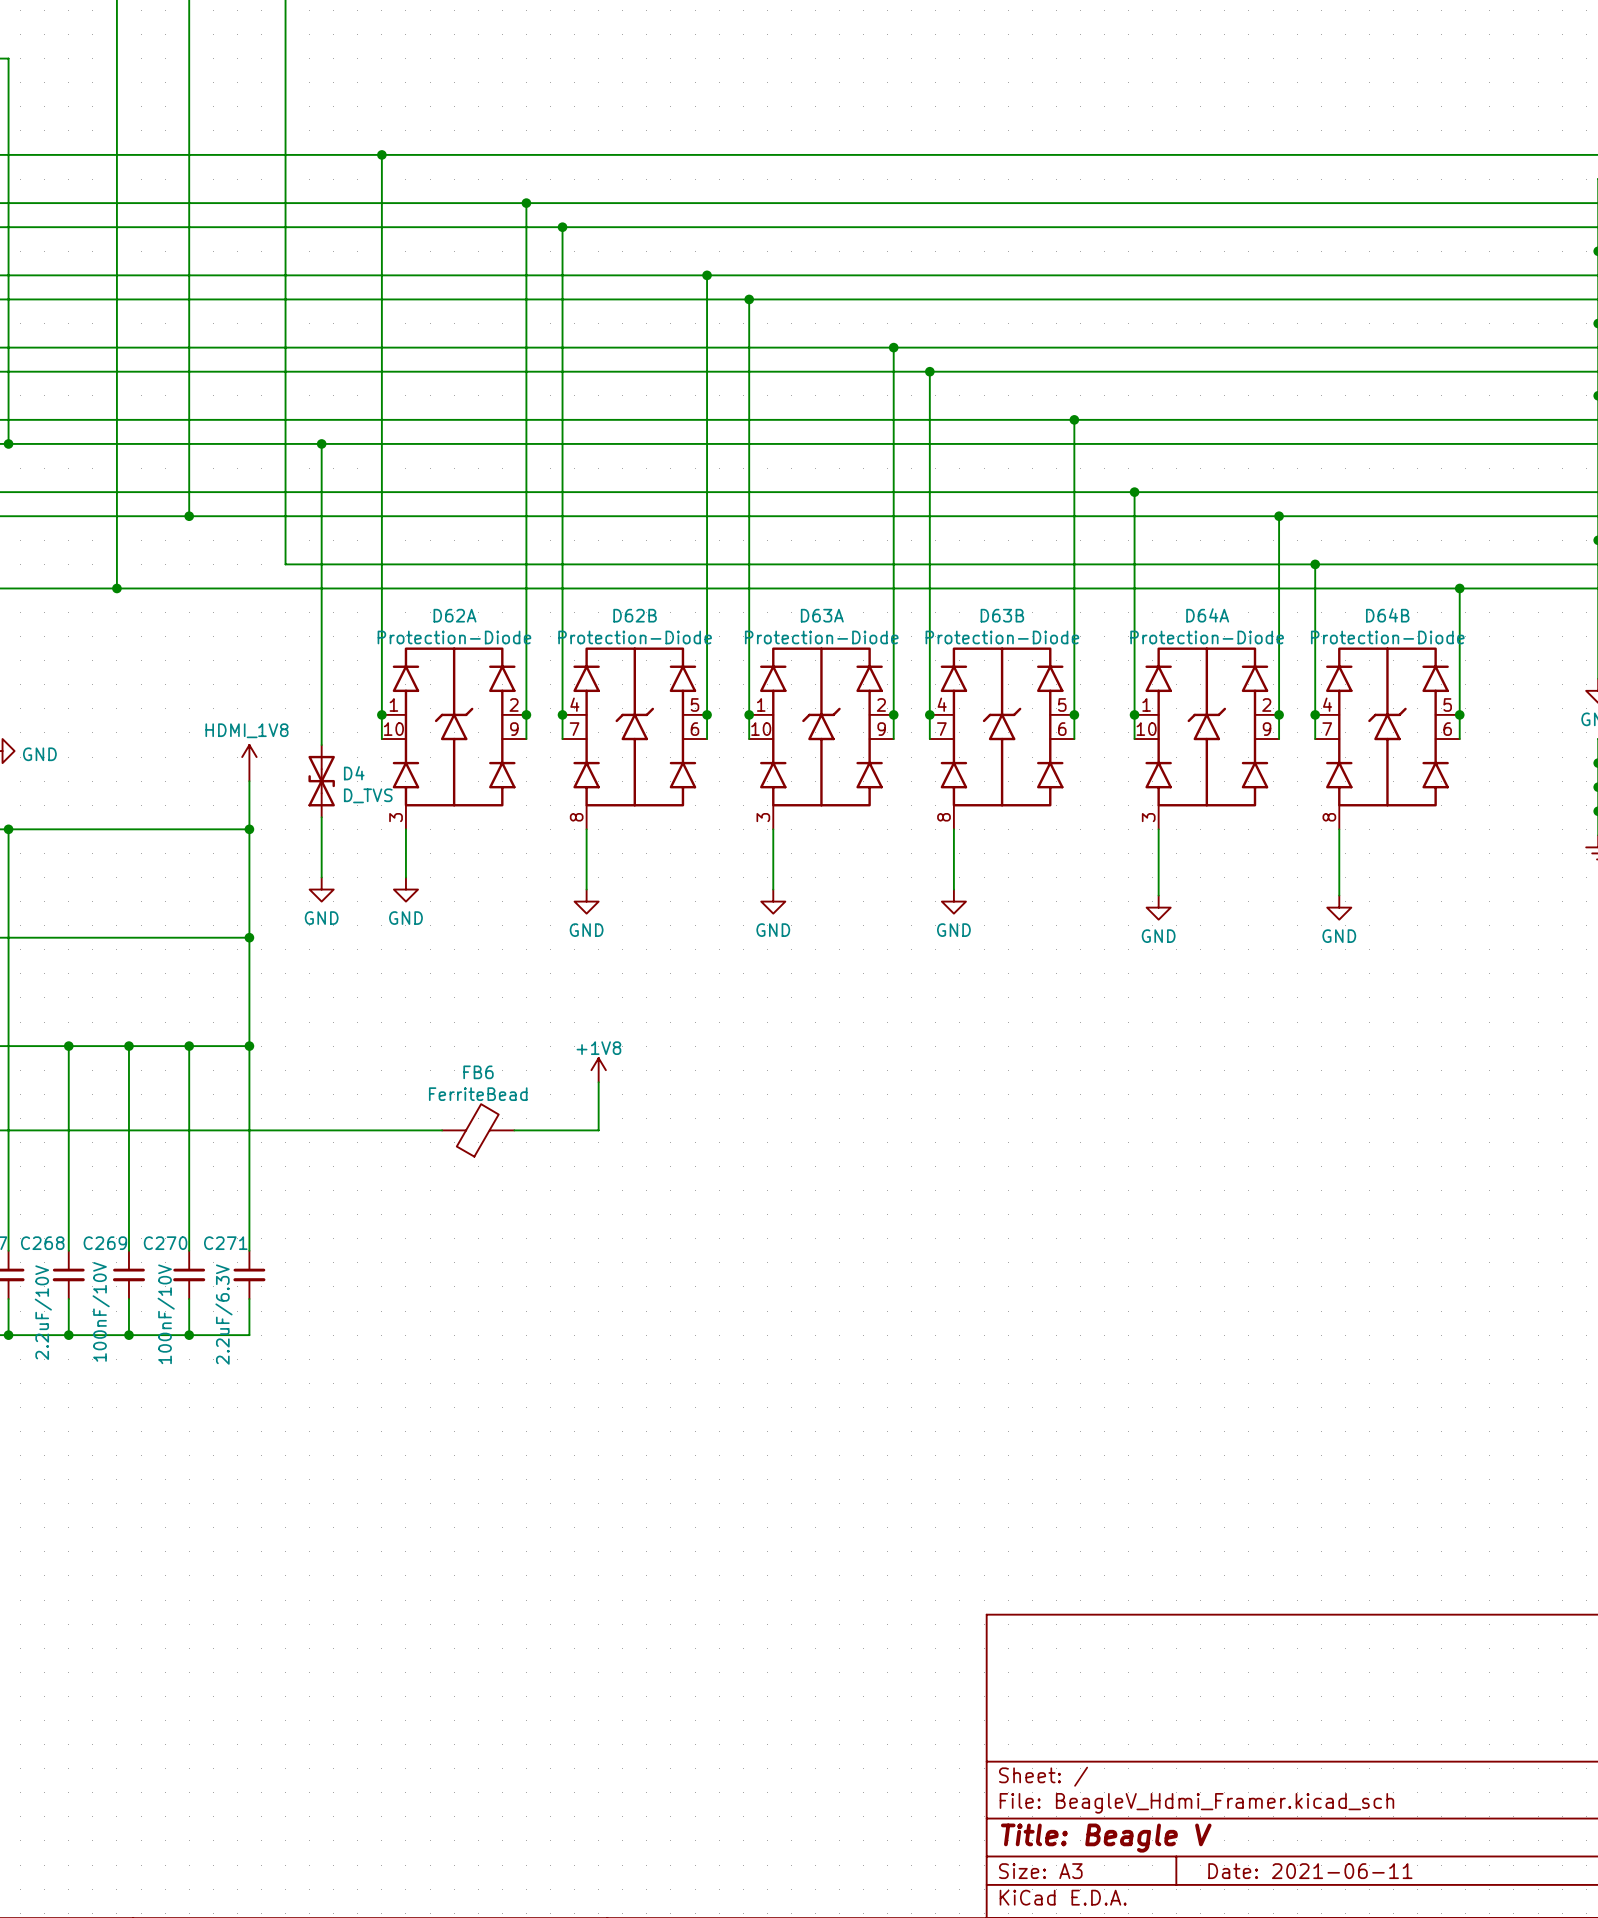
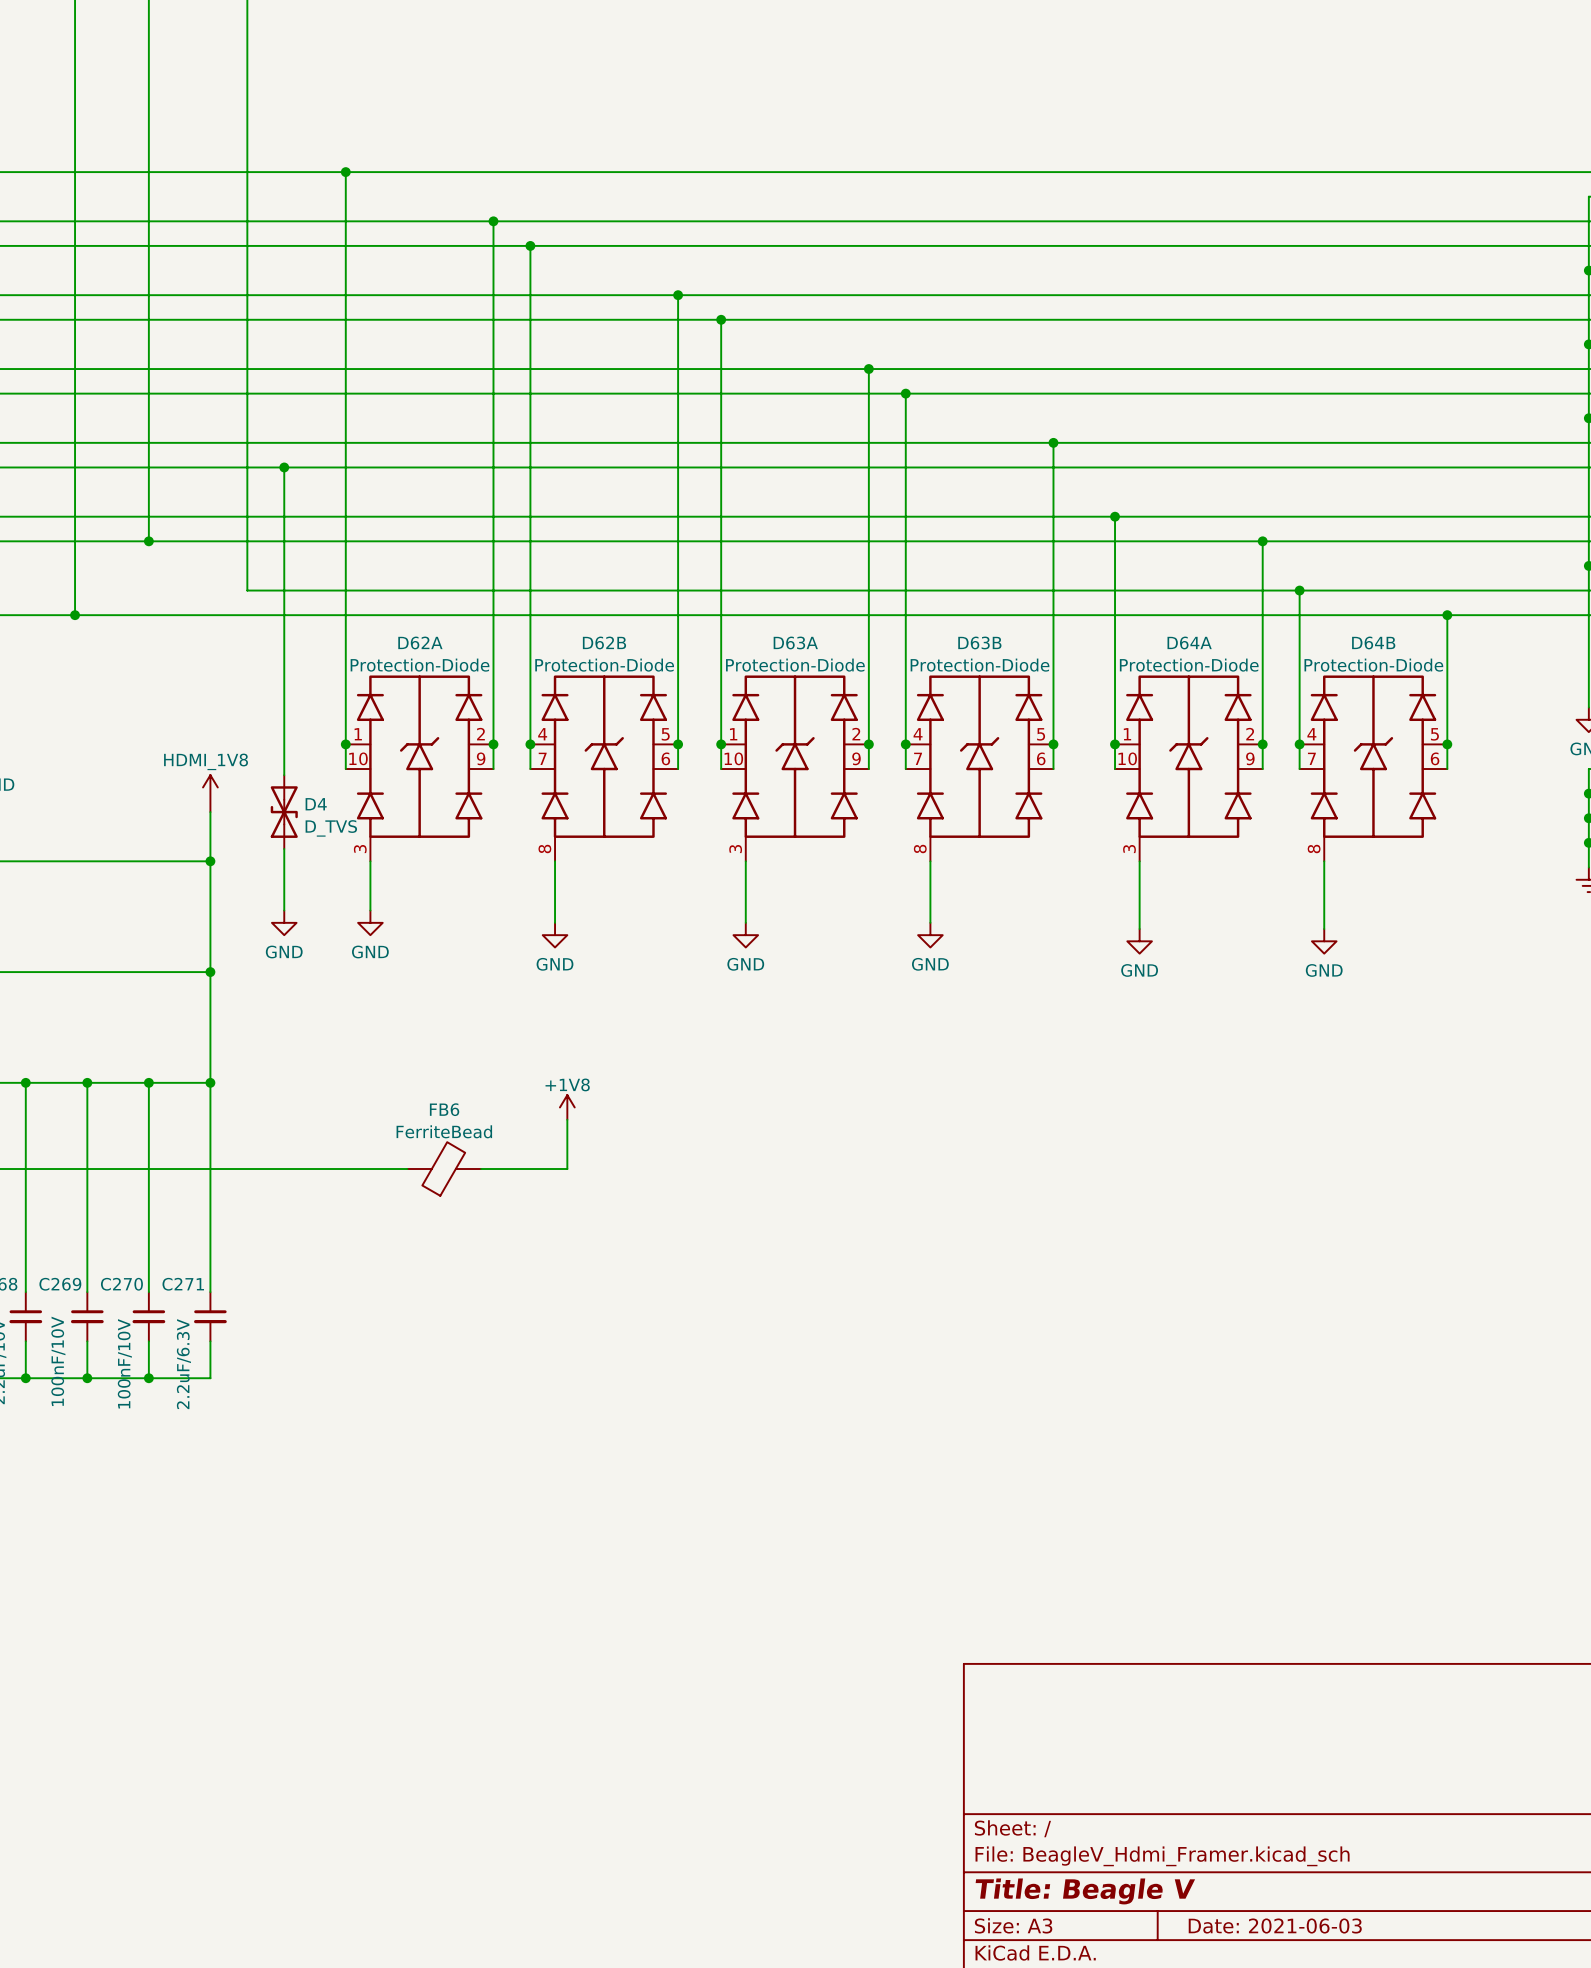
title block: Date: 2021-06-11 (1310, 1871) -> Date: 2021-06-03 (1275, 1926)

